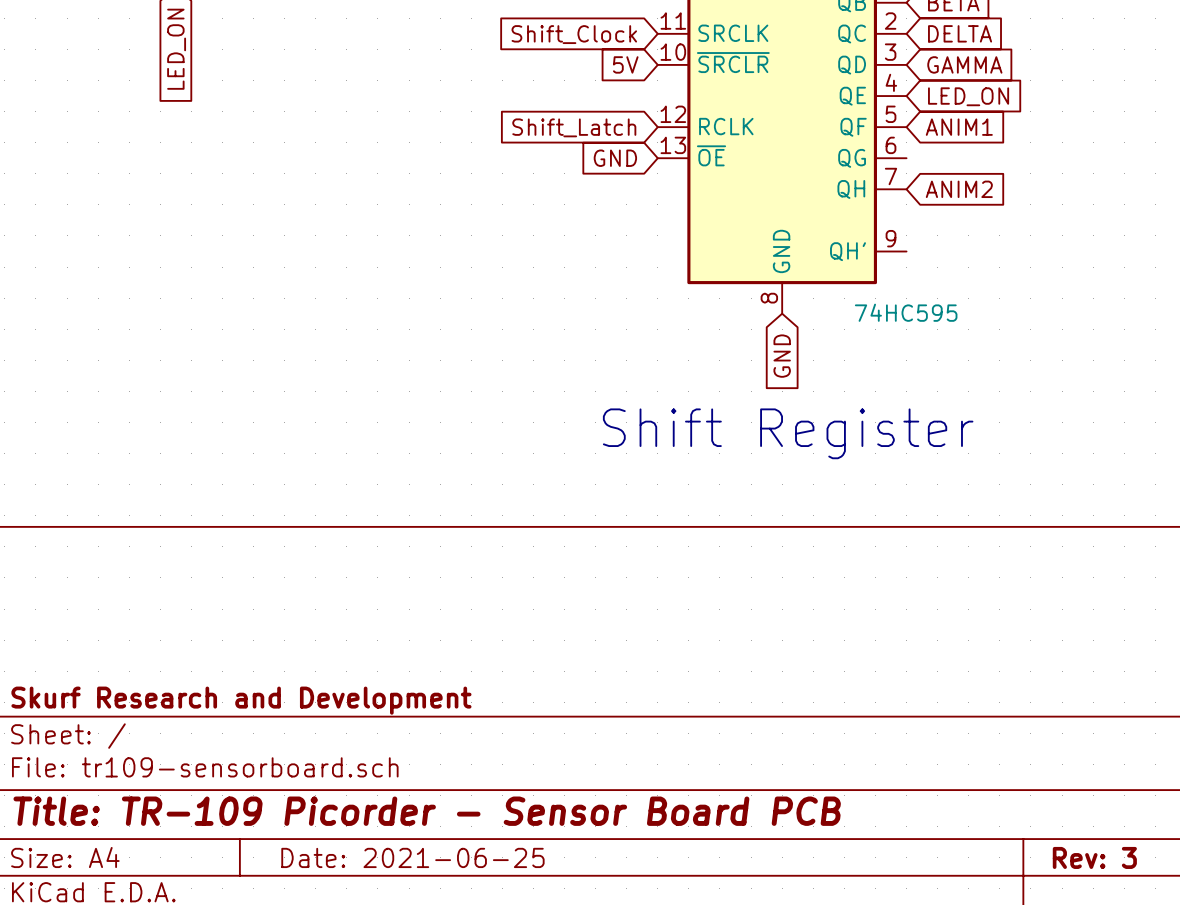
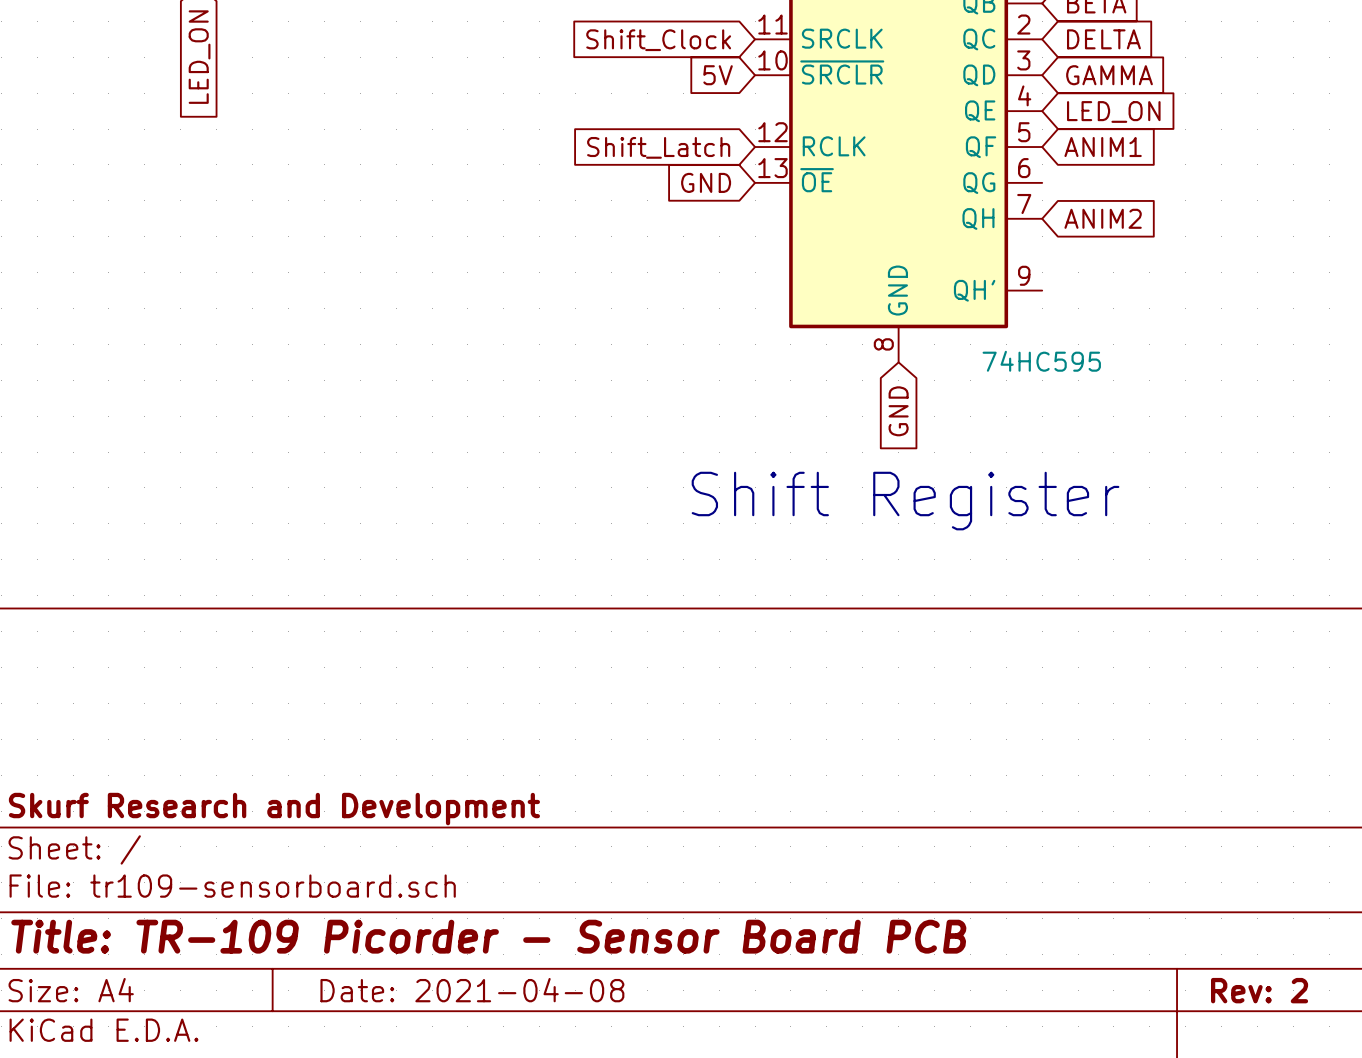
title block: Date: 2021-06-25 (412, 857) -> Date: 2021-04-08 (472, 990)
title block: Rev: 3 (1094, 857) -> Rev: 2 (1259, 990)

